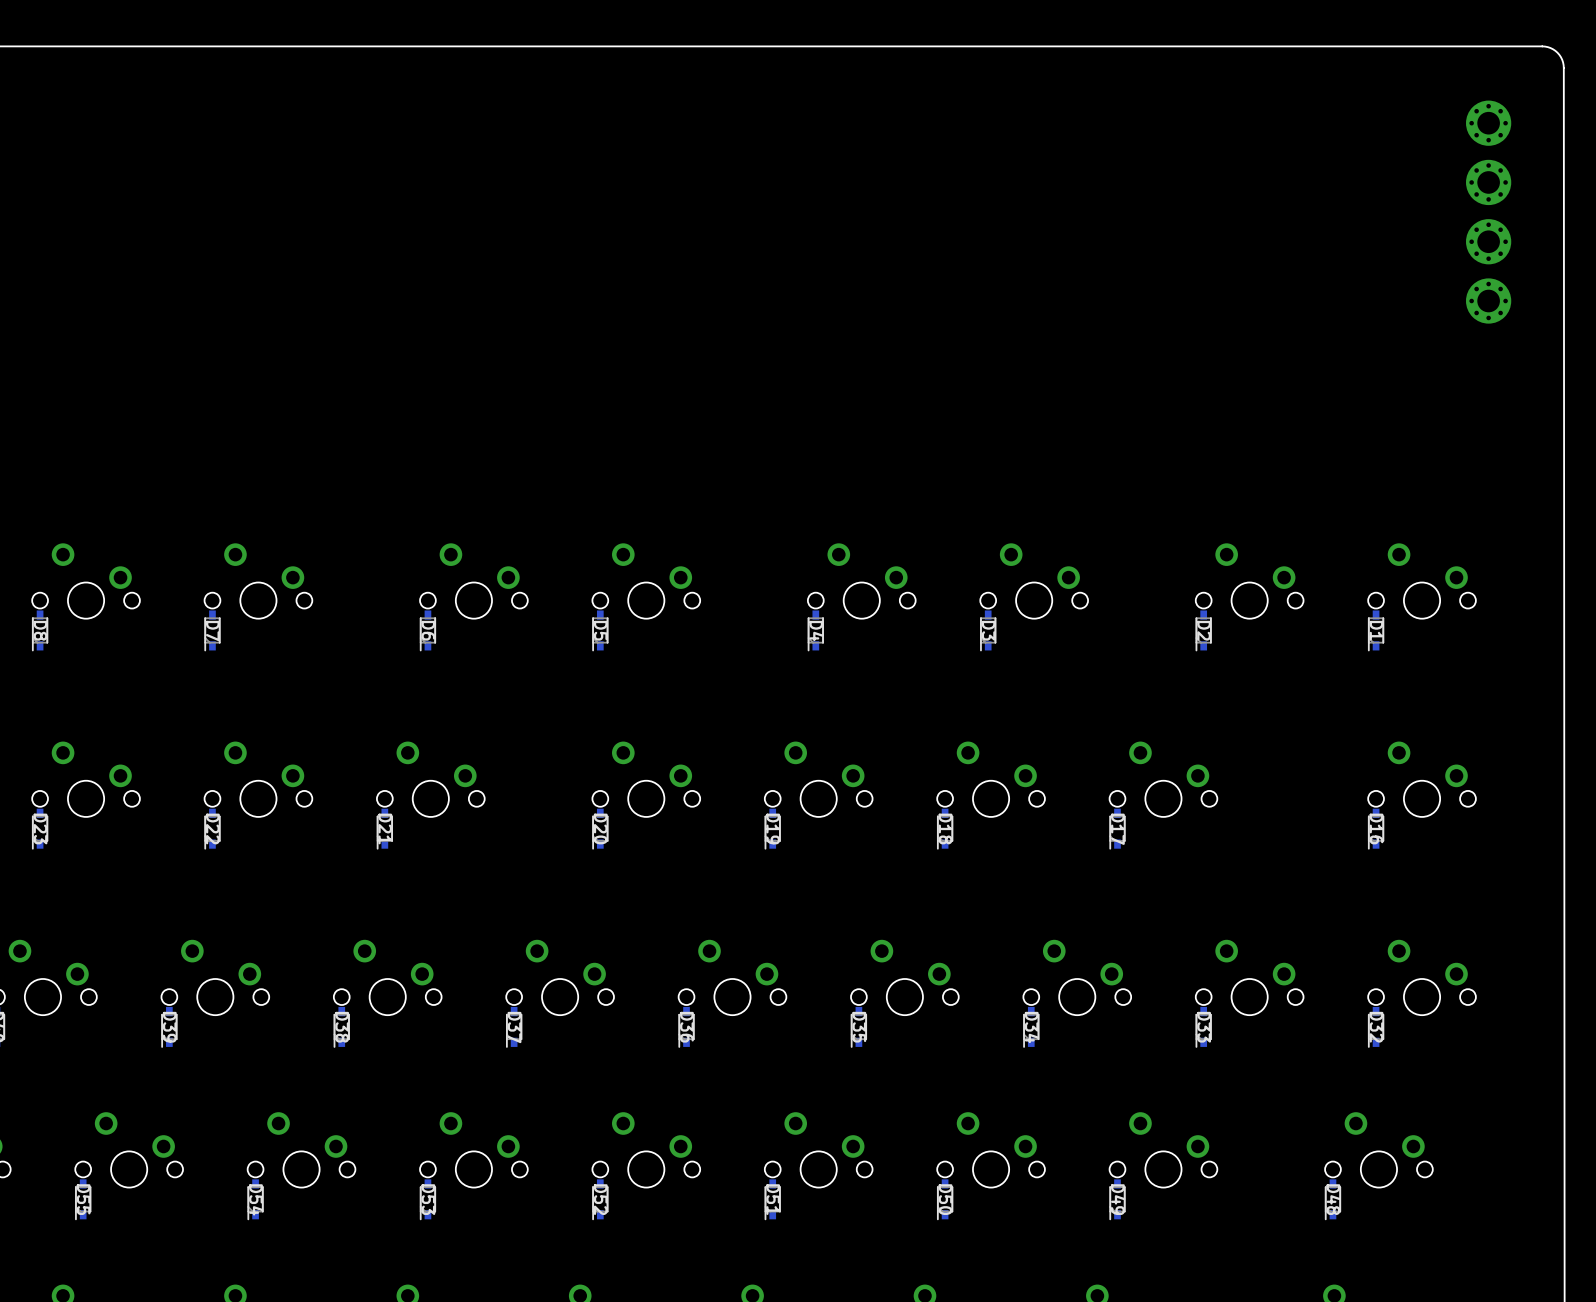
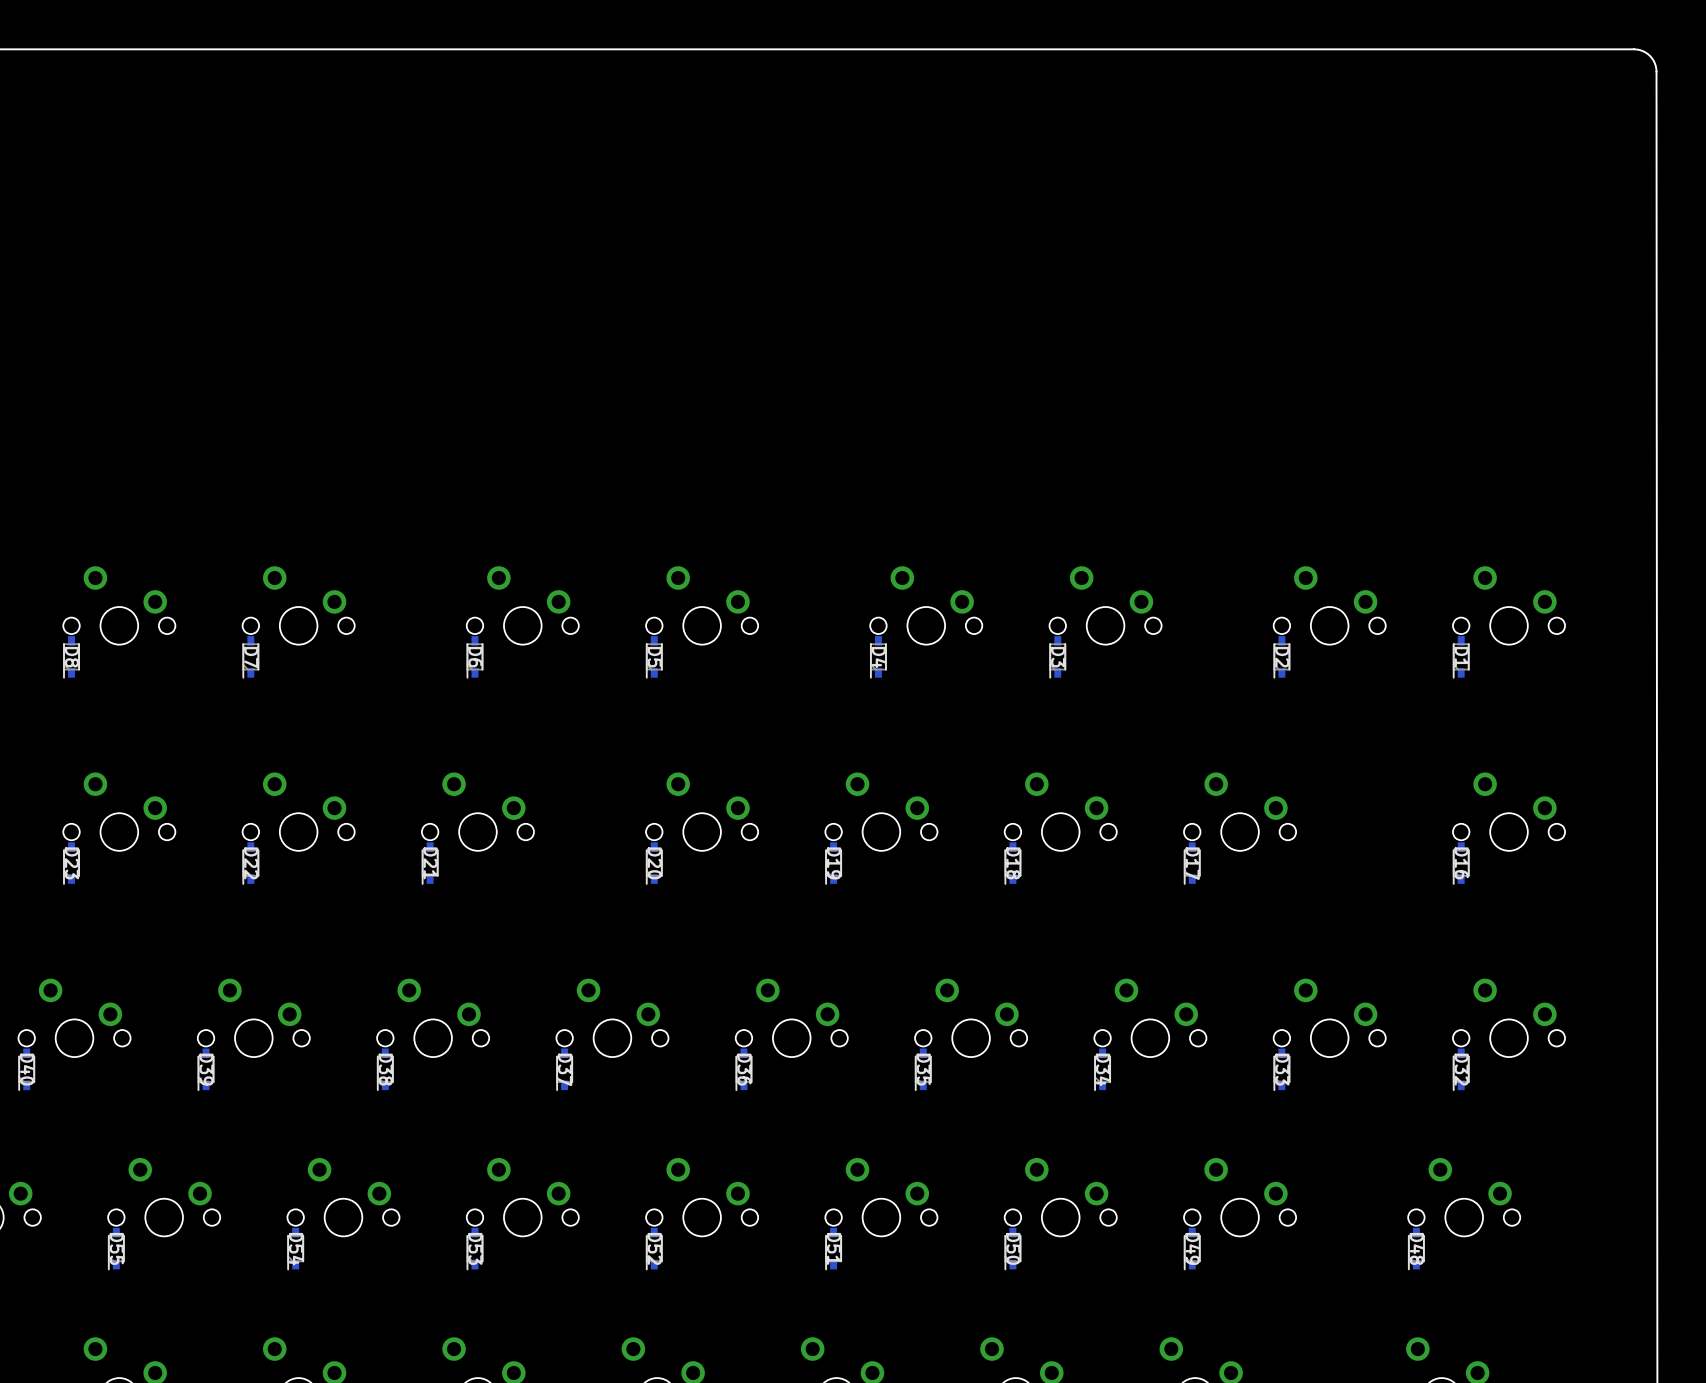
part: (1488, 123) -> none
part: (1488, 182) -> none
part: (1488, 241) -> none
part: (1488, 301) -> none

